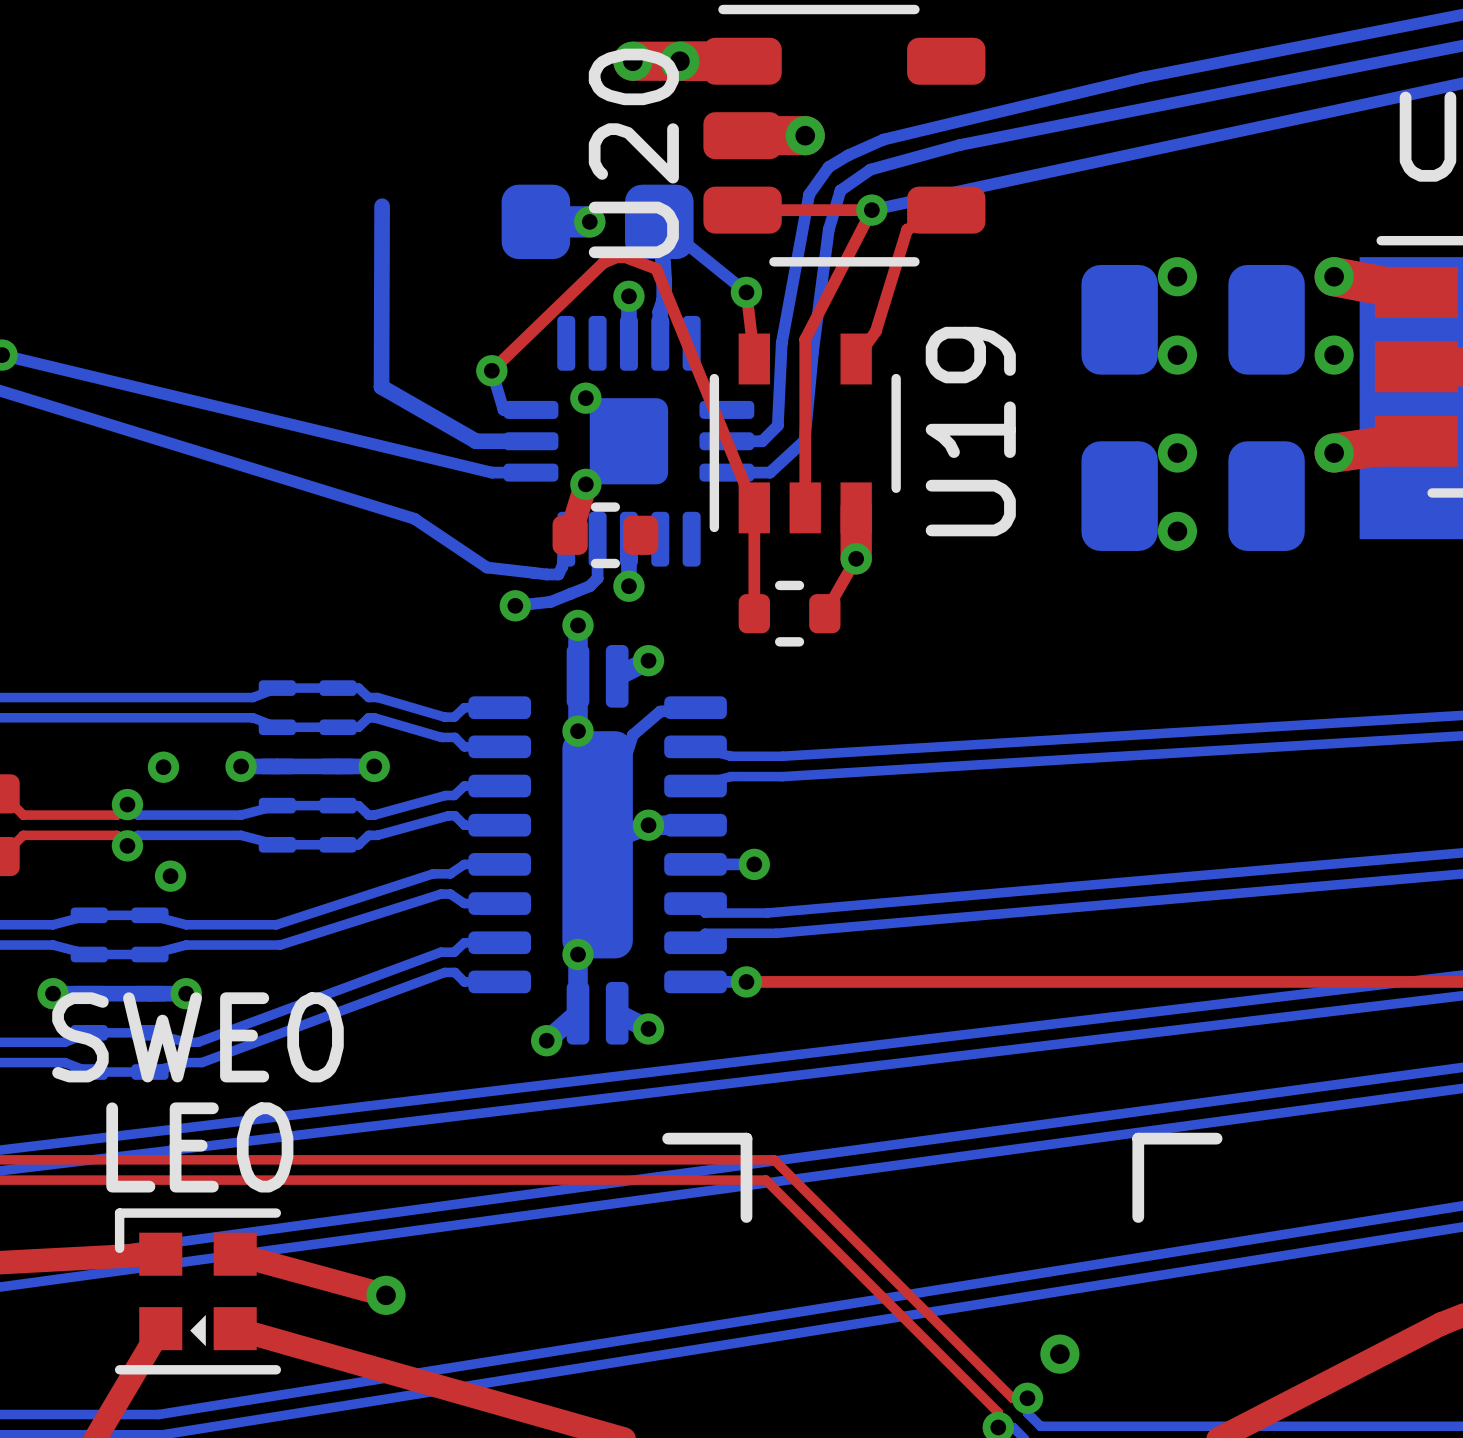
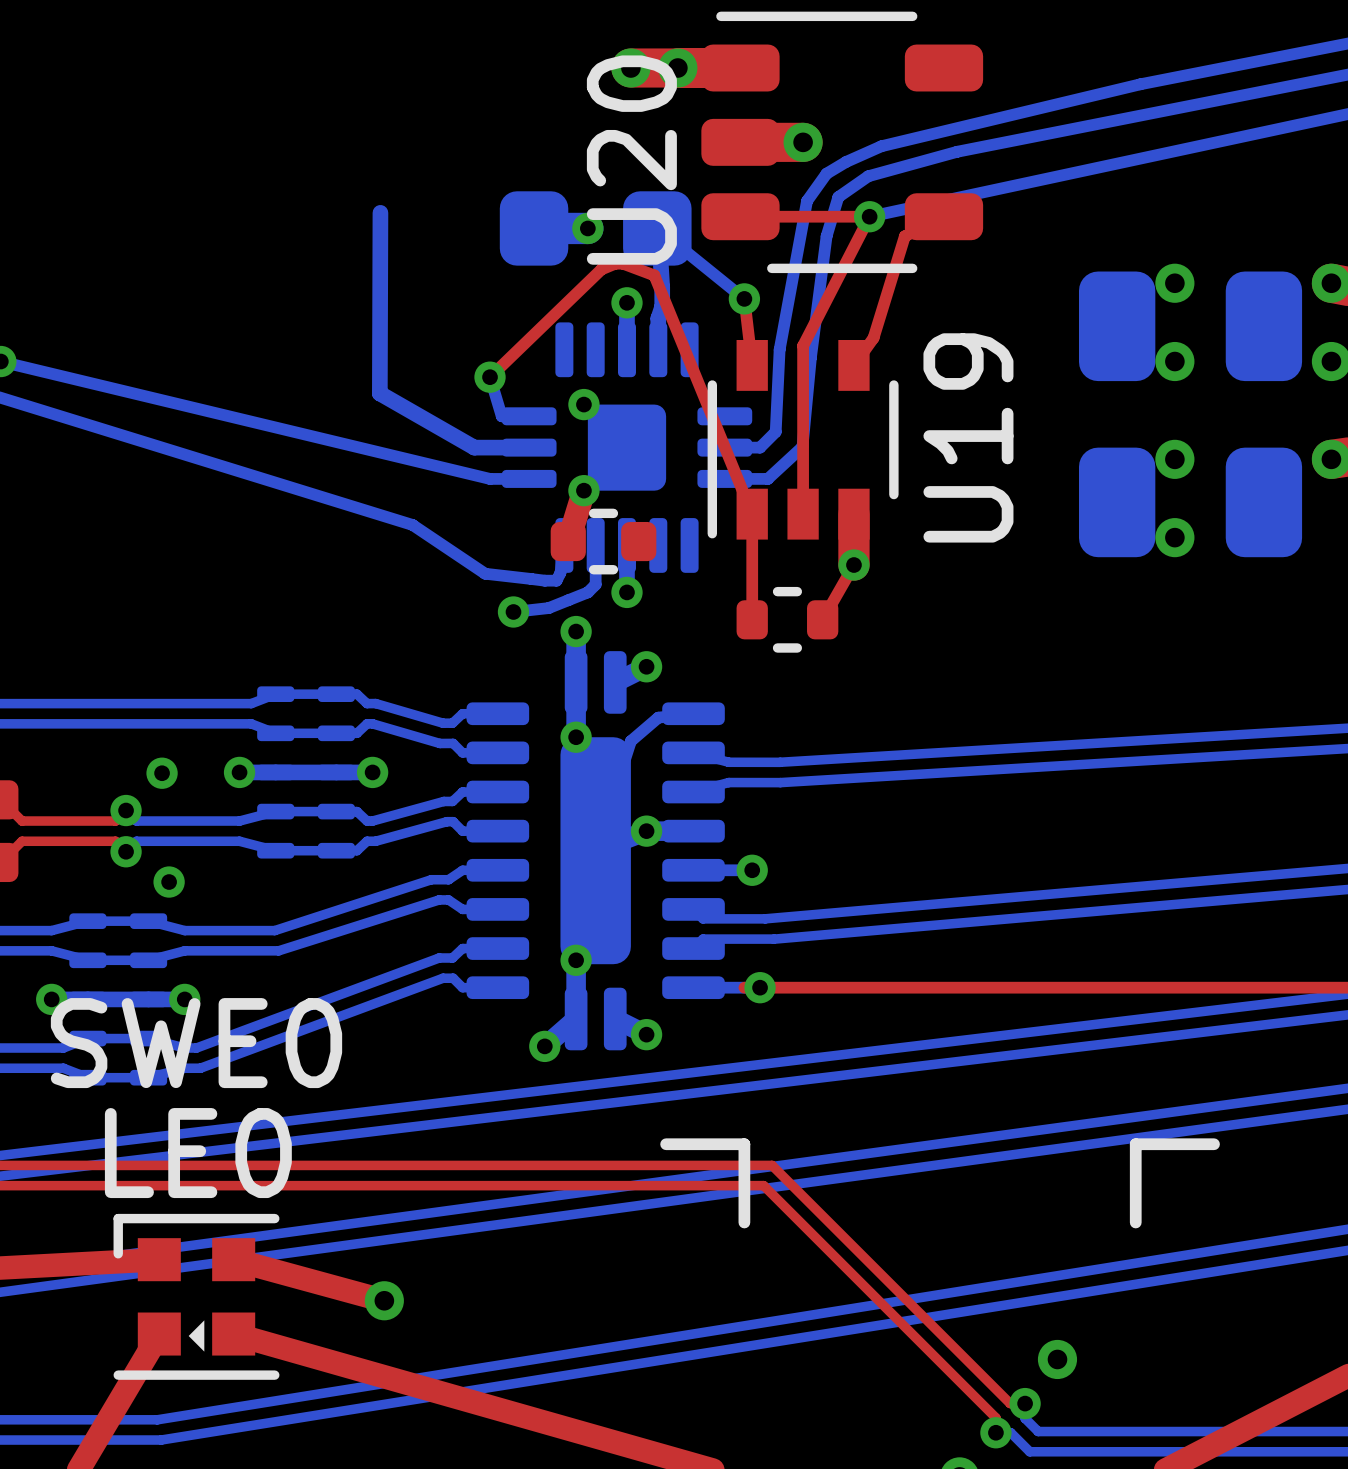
via position: (746, 981) -> (760, 987)

